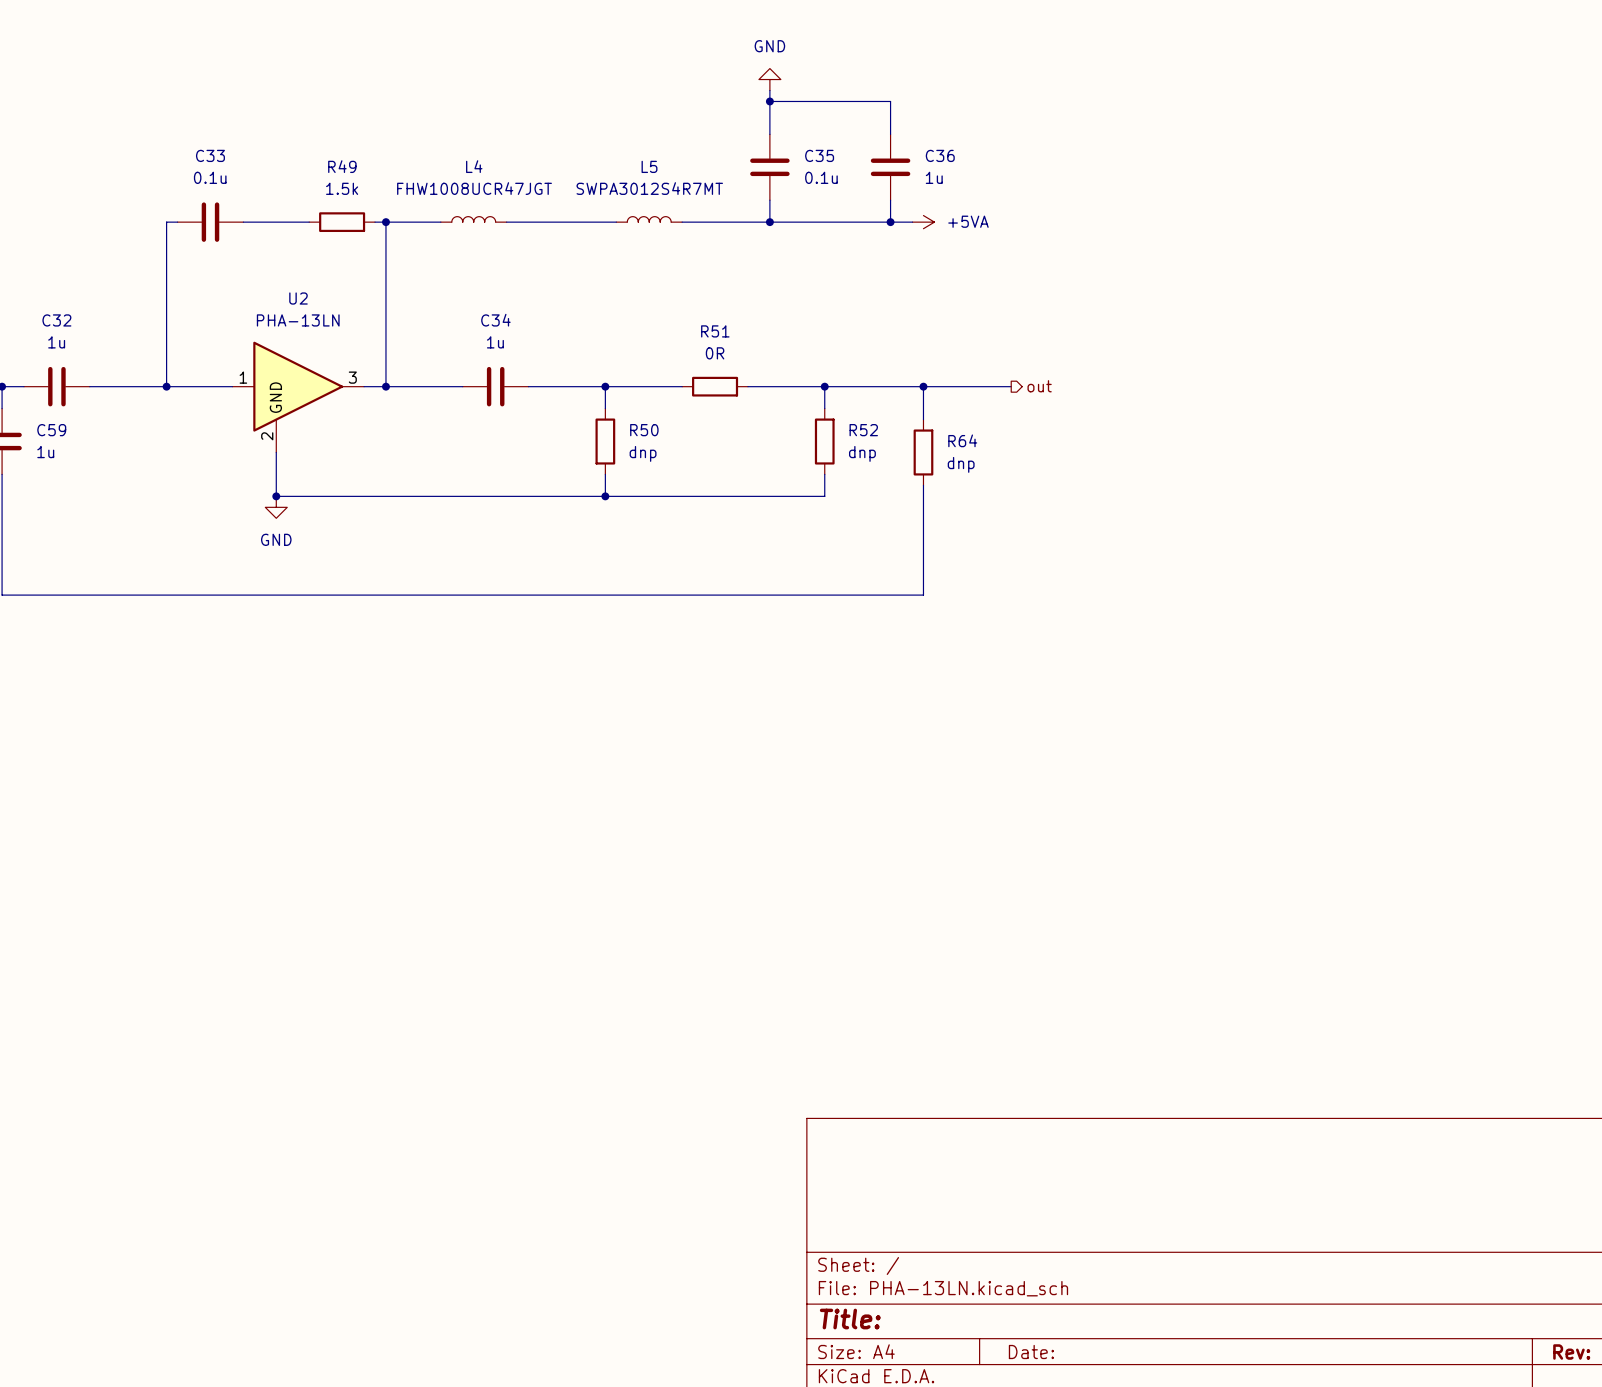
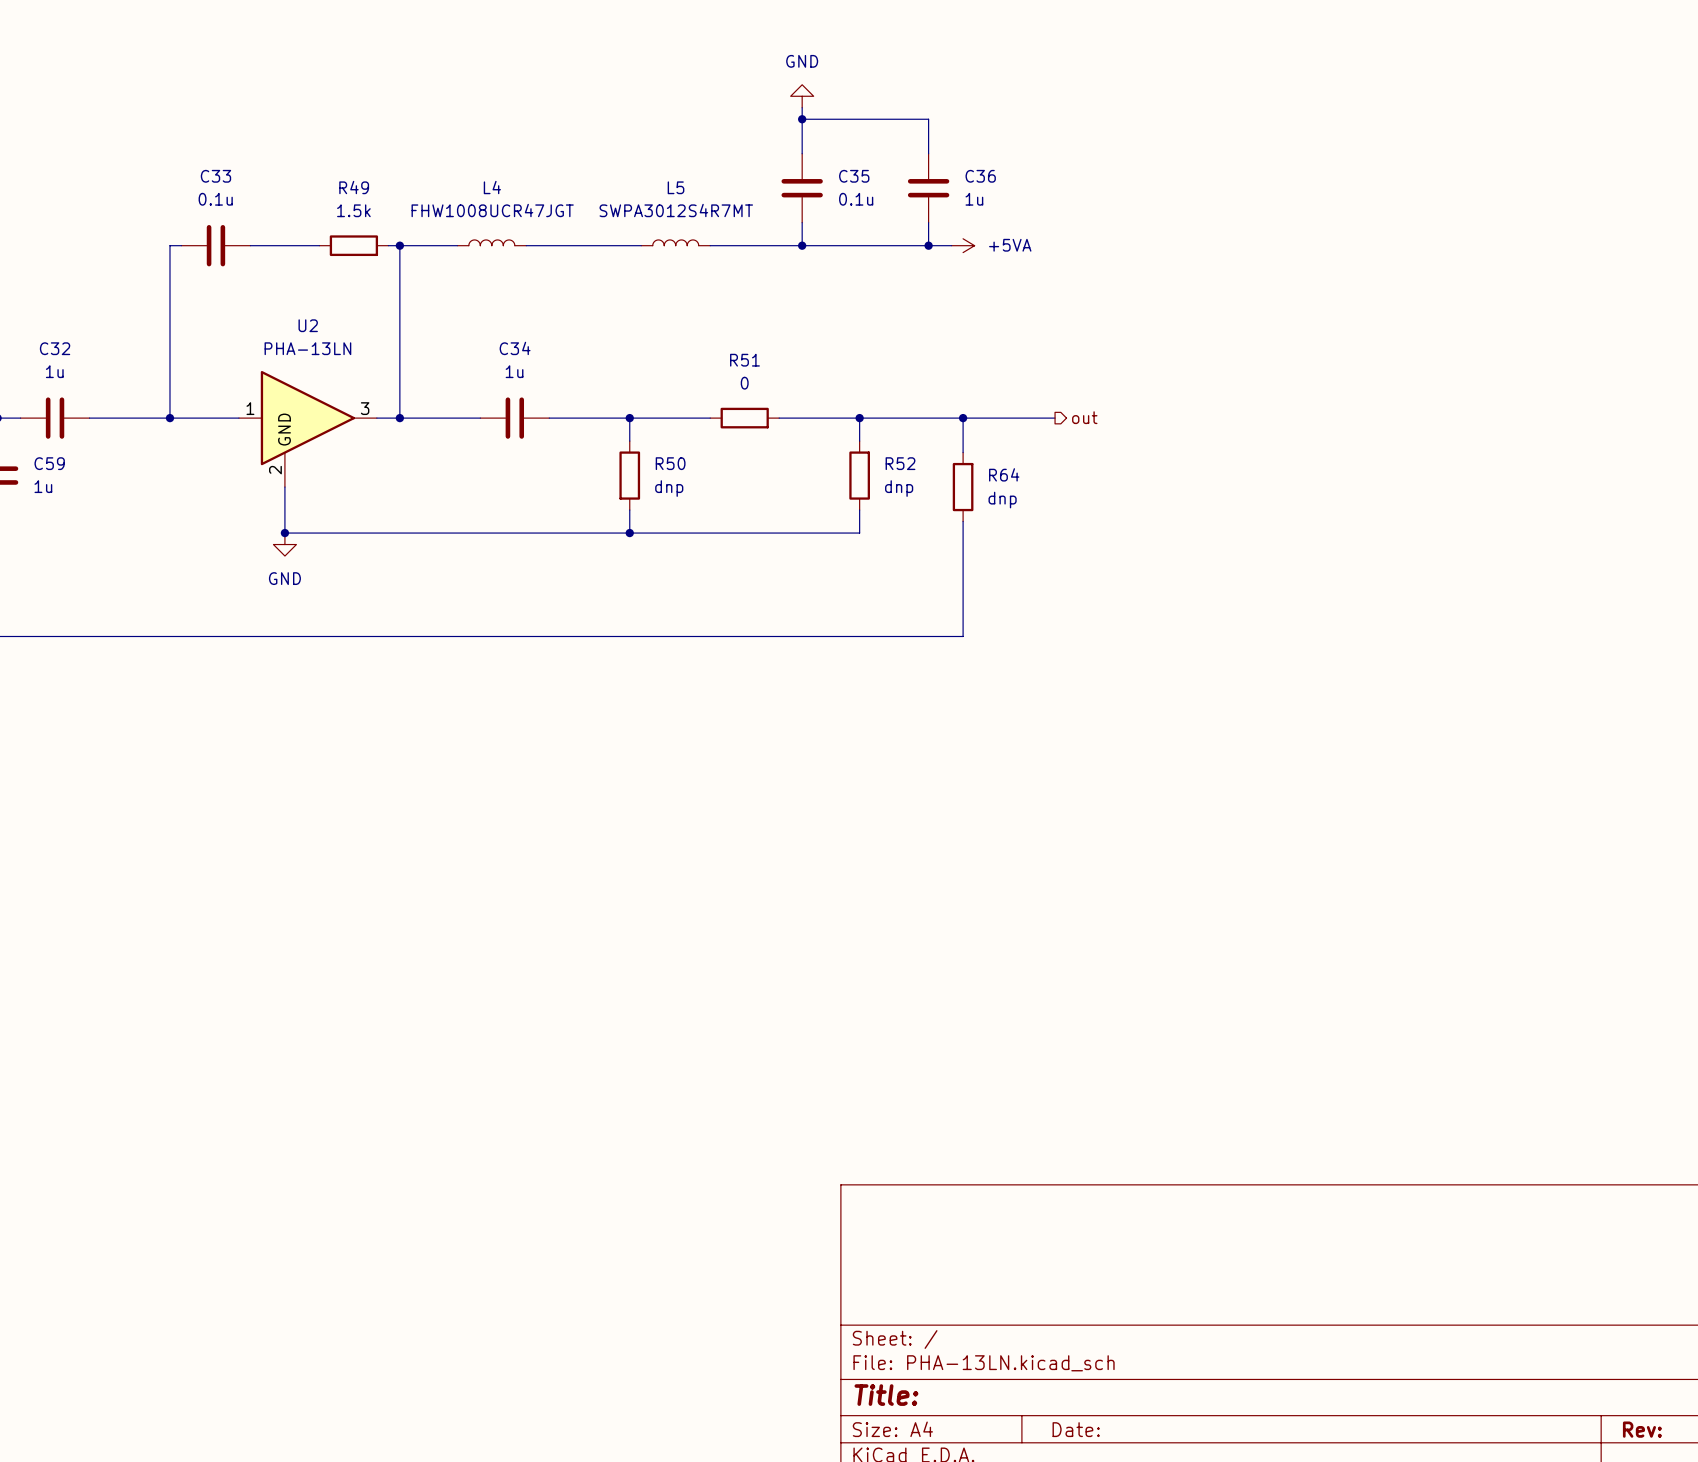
R51 value: 0R (715, 353) -> 0 (744, 383)

